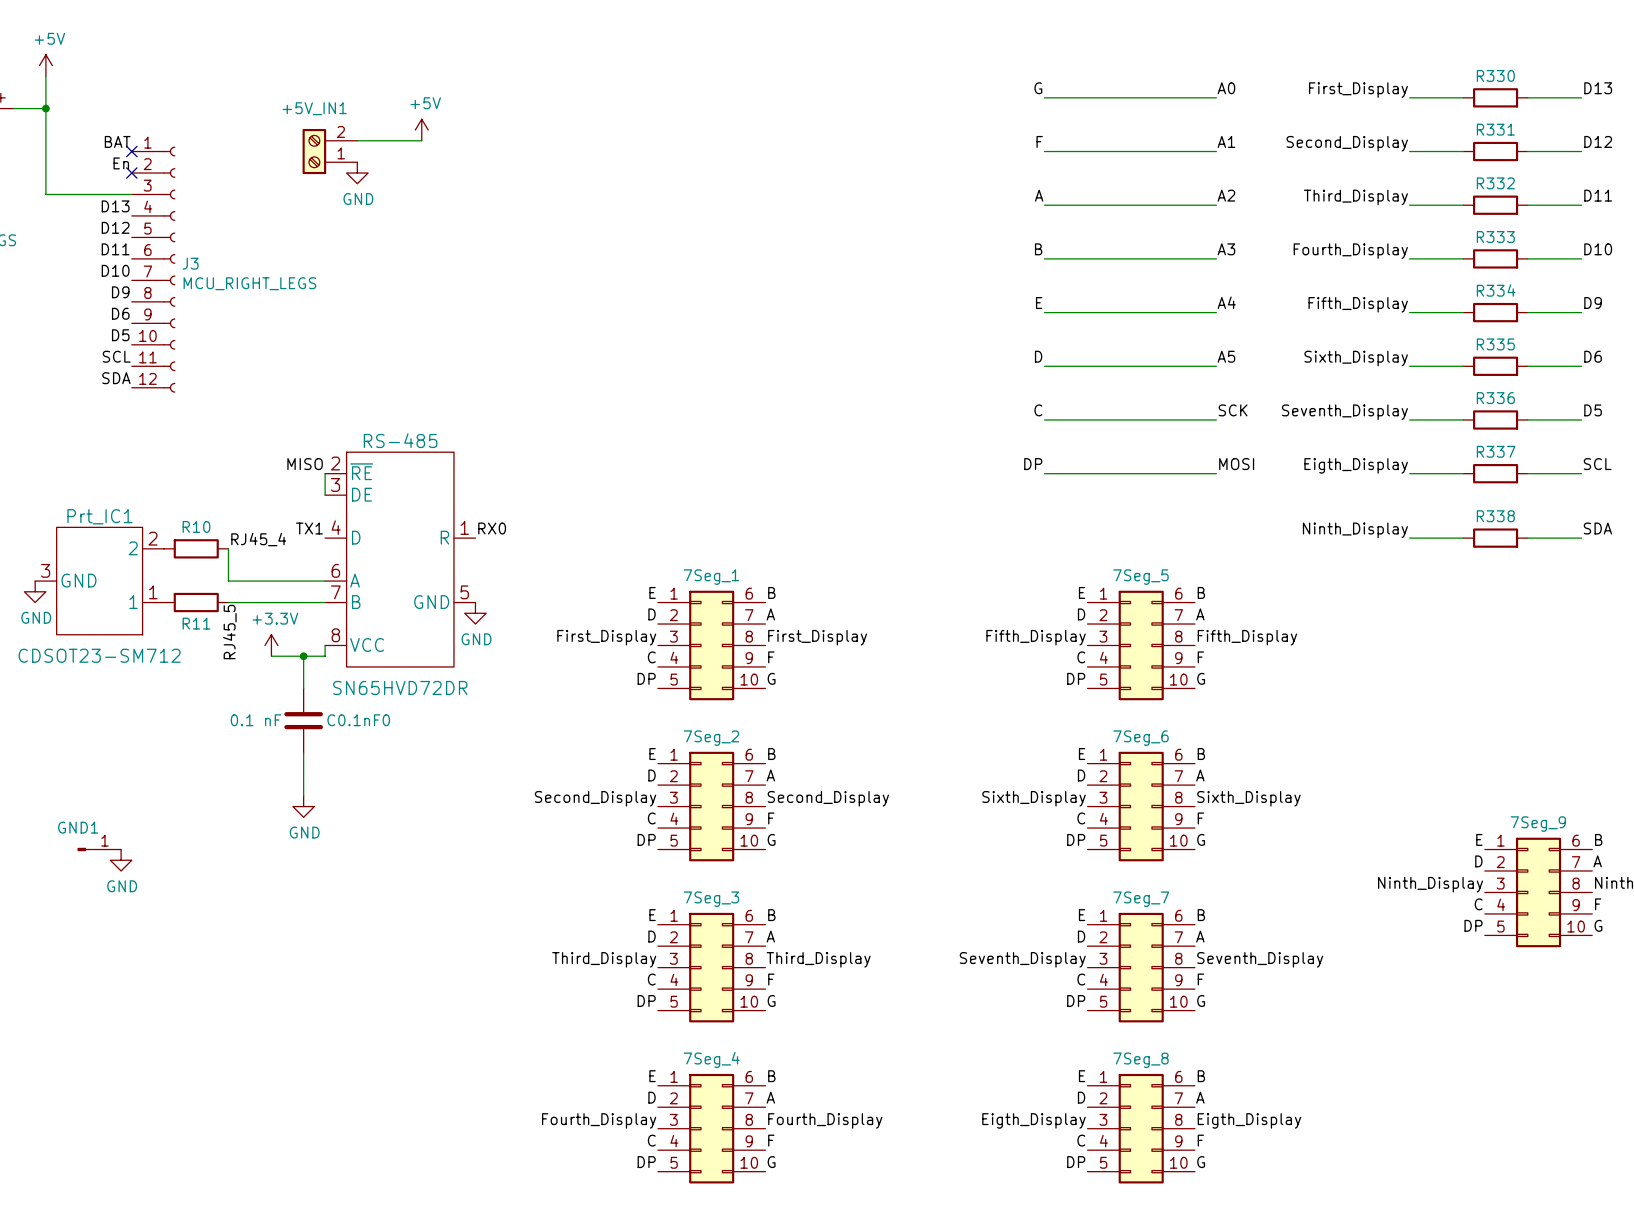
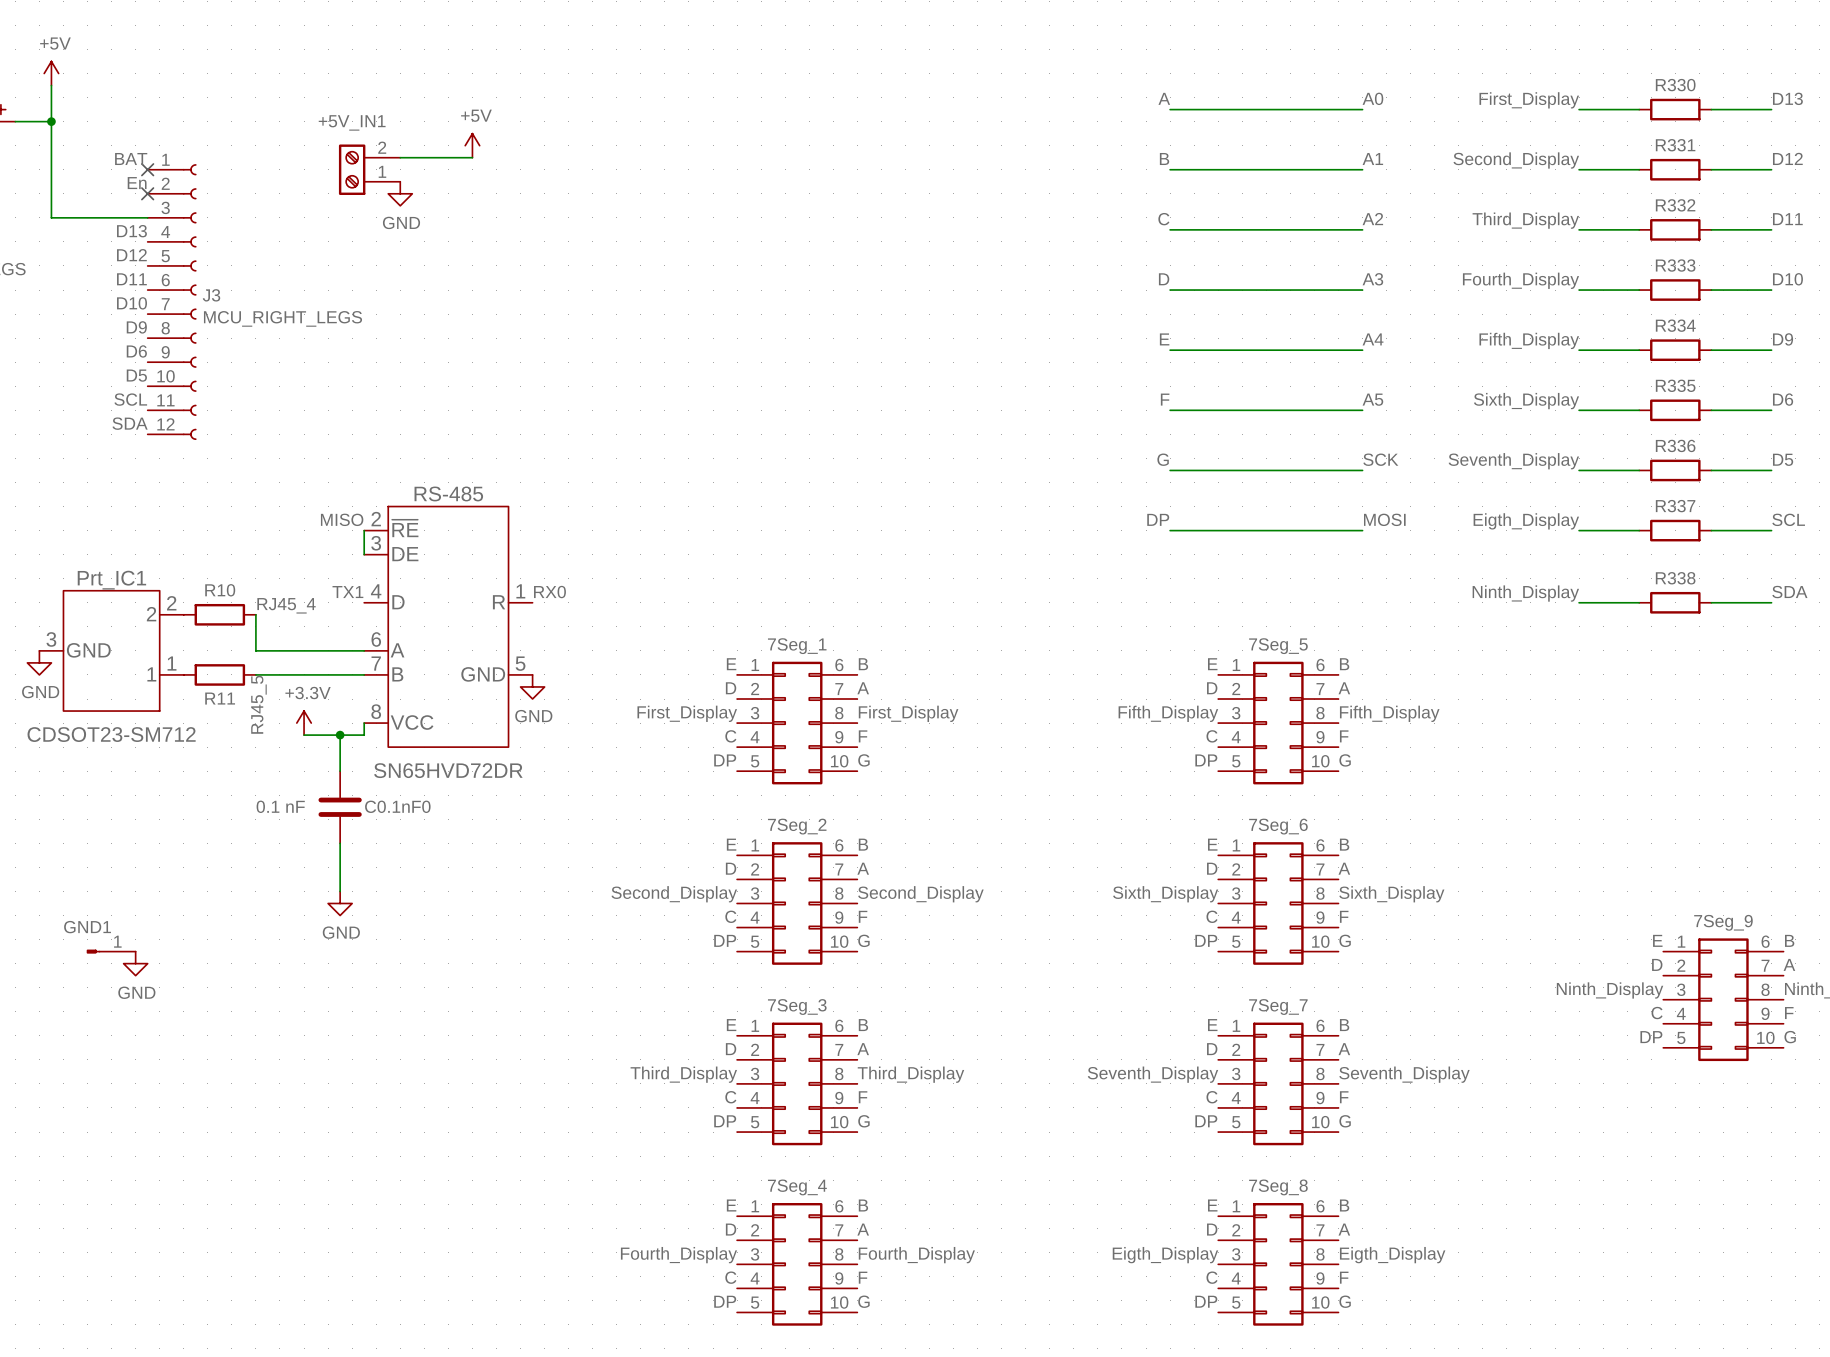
label: G (1038, 88) -> A (1164, 98)
label: F (1039, 141) -> B (1164, 159)
label: A (1039, 195) -> C (1163, 219)
label: B (1038, 249) -> D (1164, 279)
label: D (1038, 356) -> F (1165, 399)
label: C (1038, 410) -> G (1163, 459)

